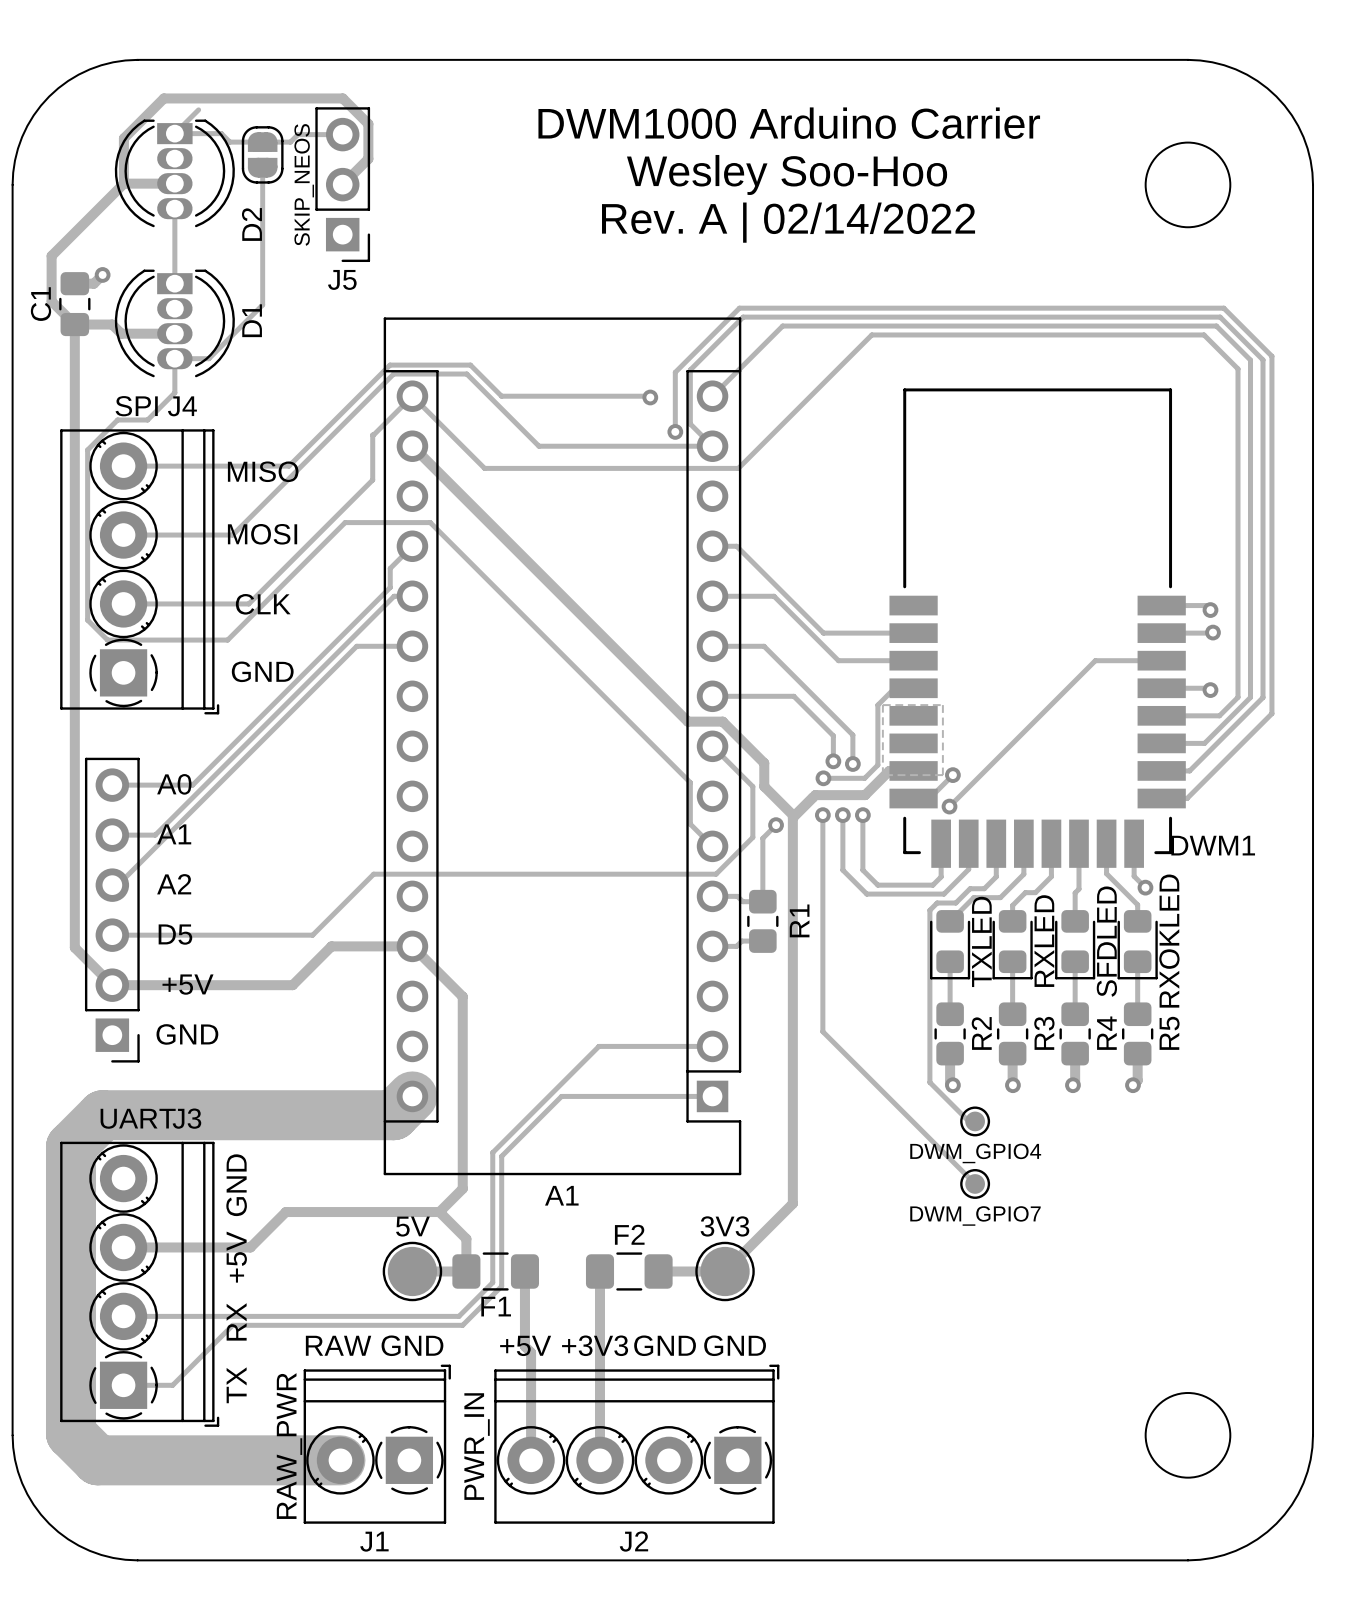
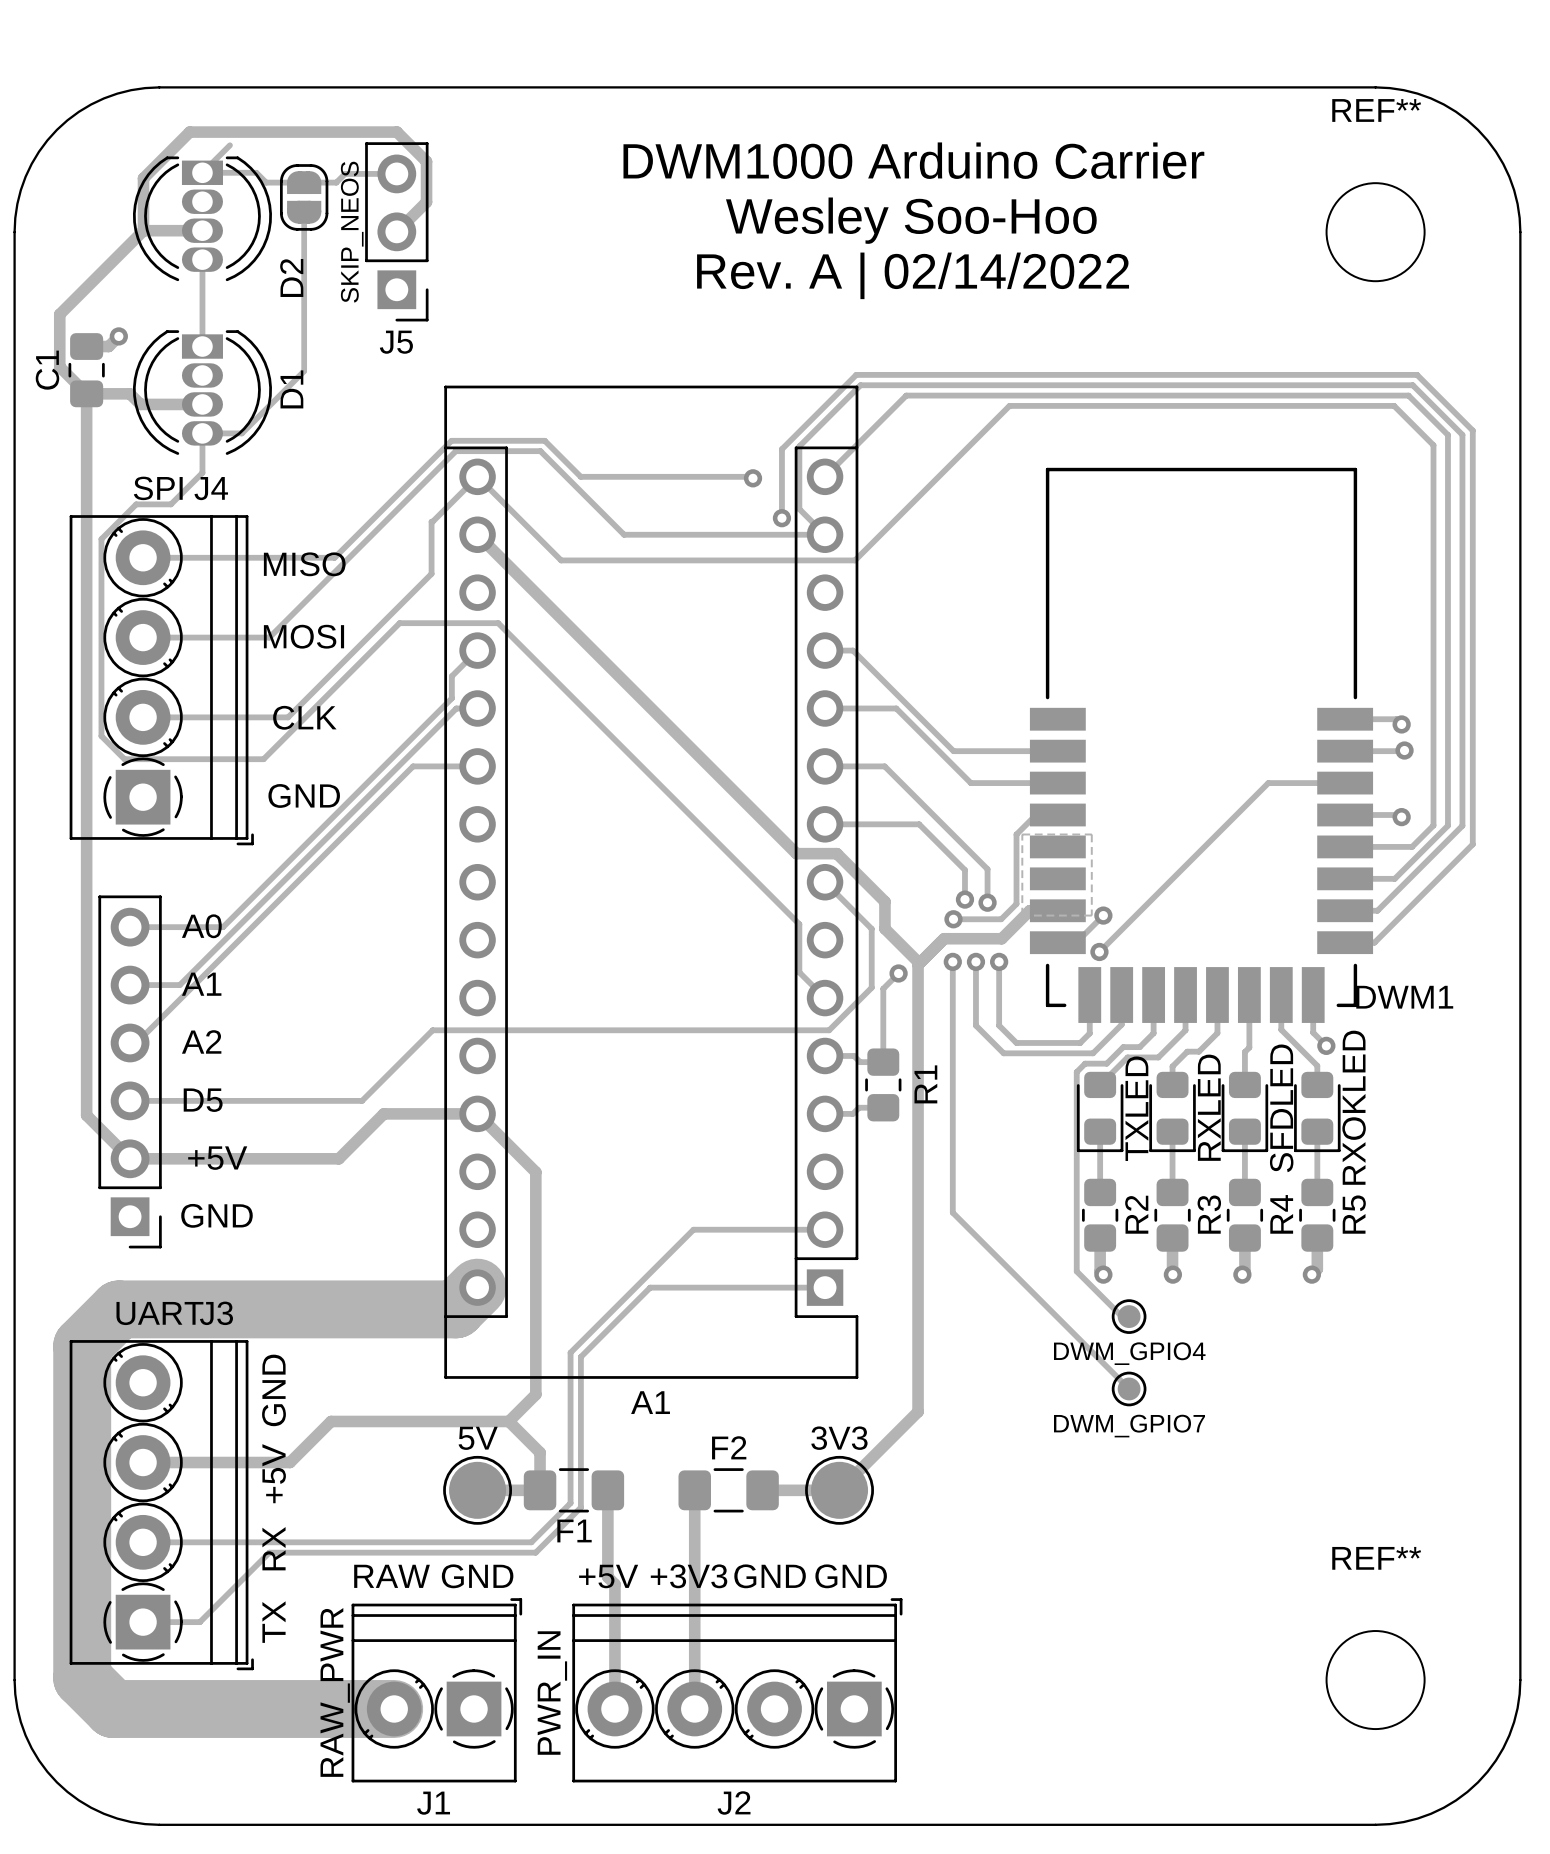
REF** name: none -> REF** (1376, 110)
REF** name: none -> REF** (1376, 1558)

